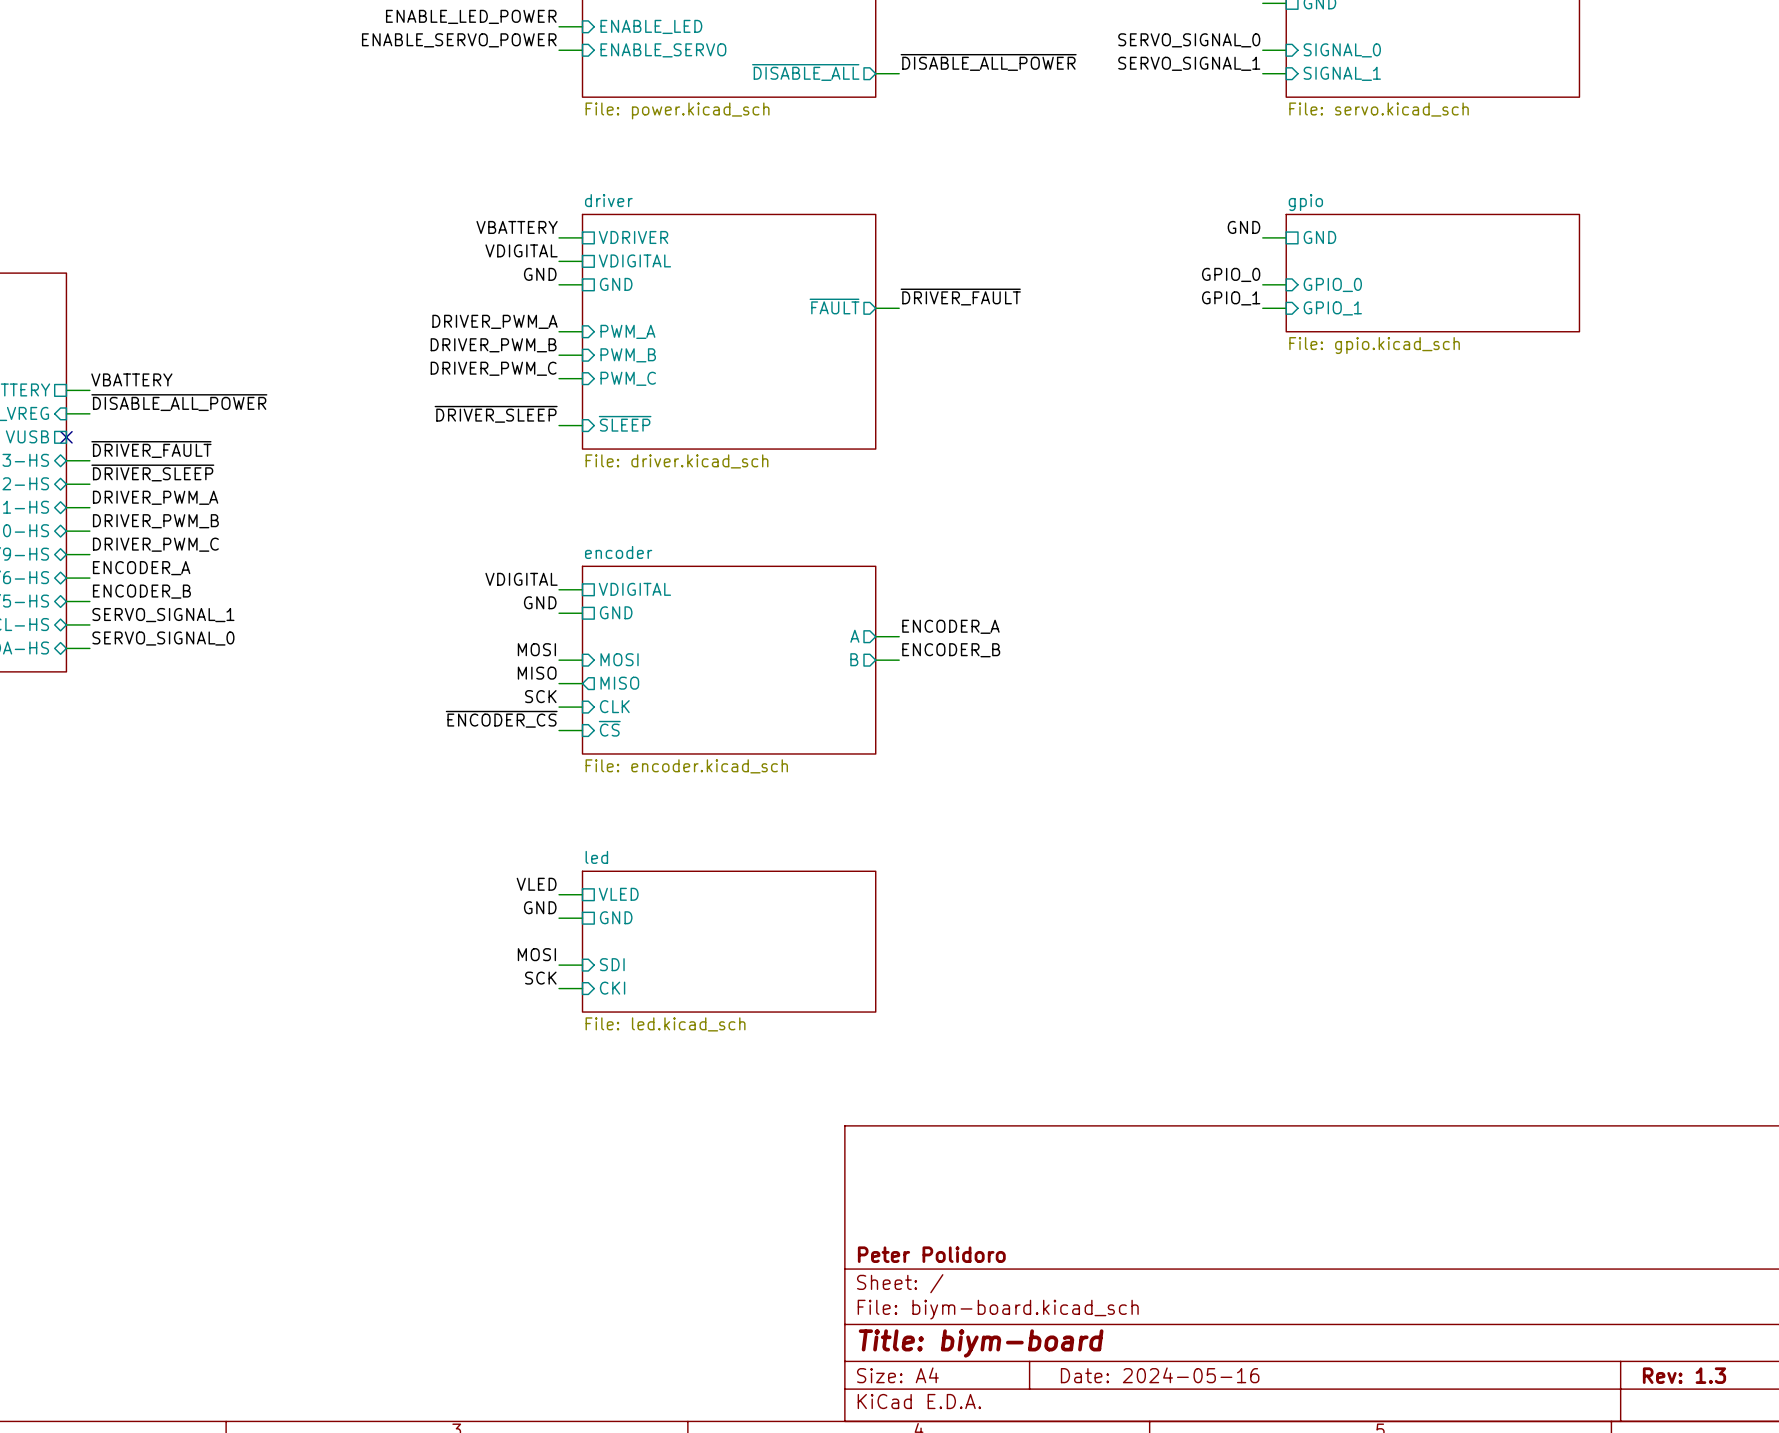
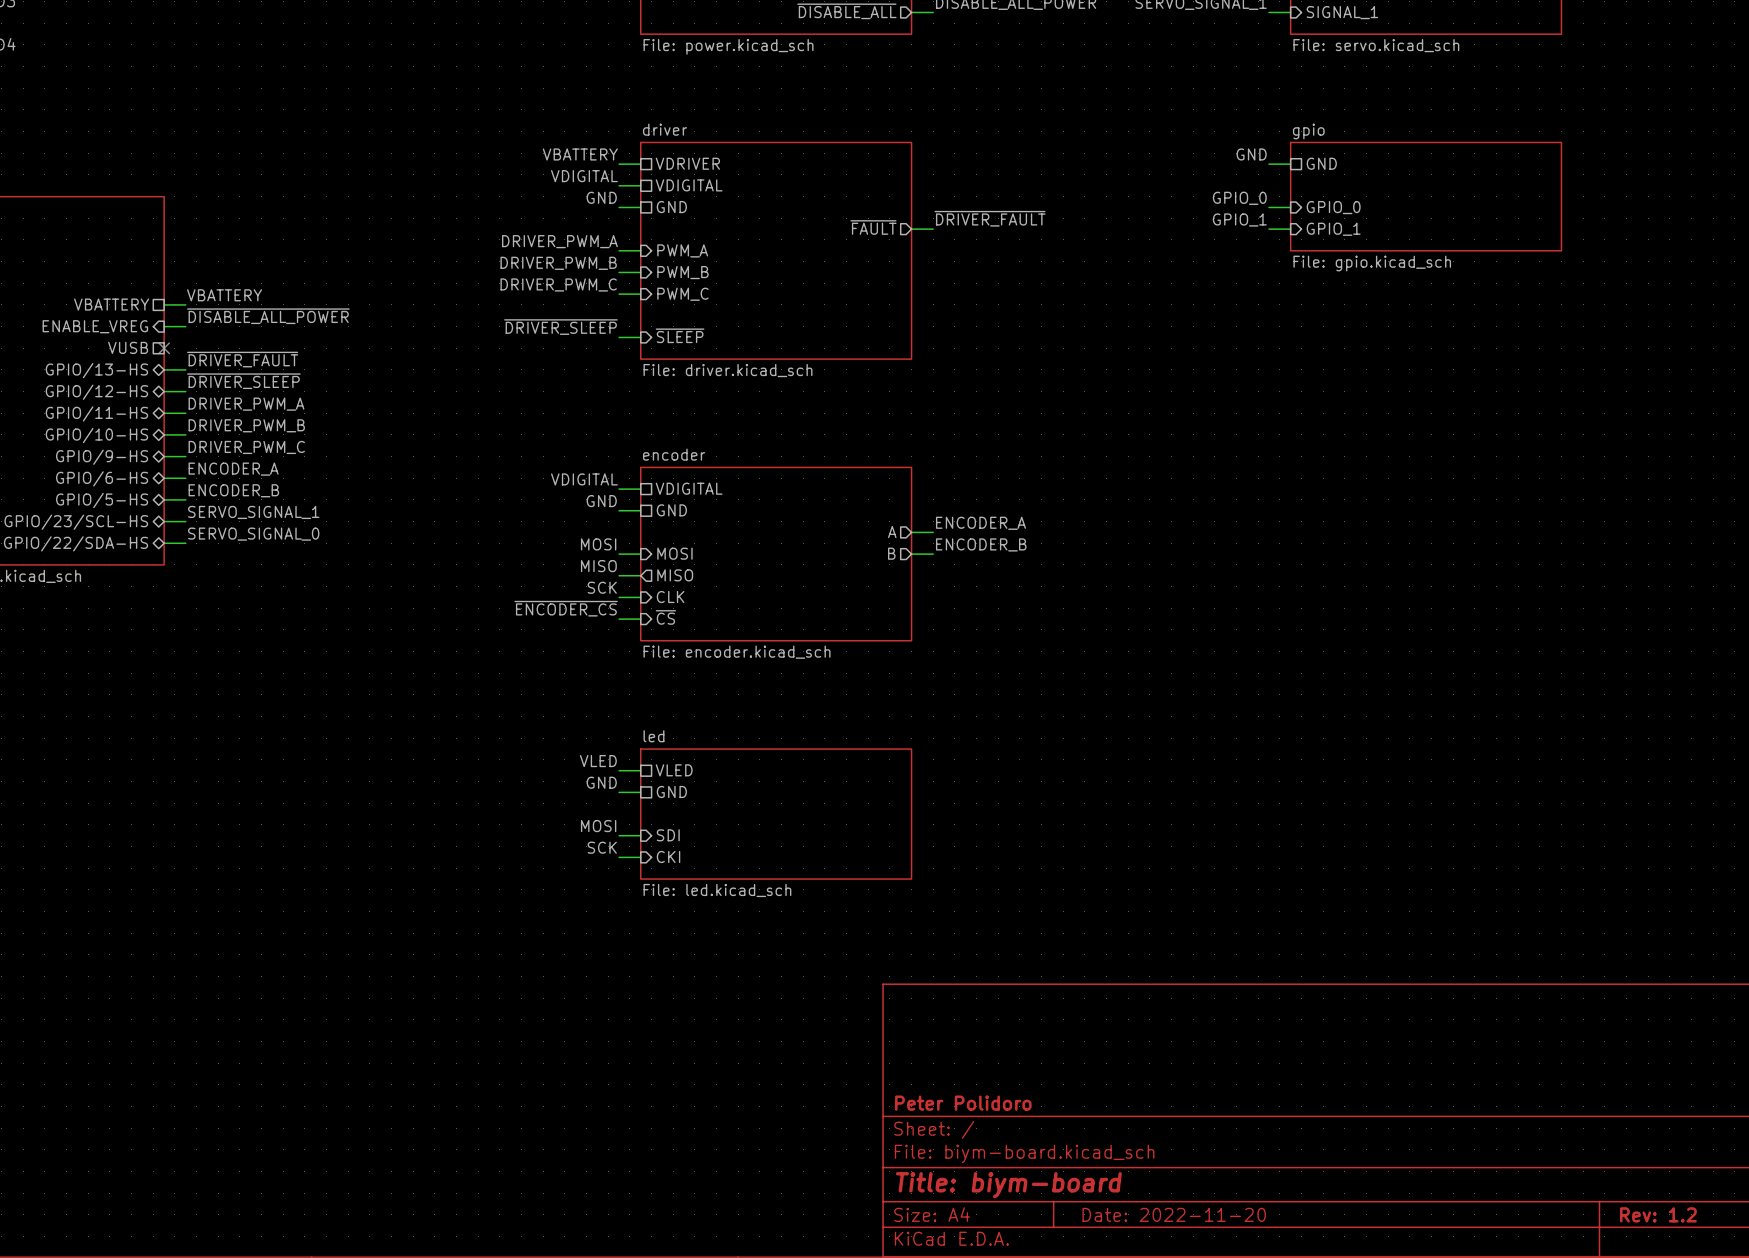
title block: Date: 2024-05-16 (1160, 1375) -> Date: 2022-11-20 (1174, 1214)
title block: Rev: 1.3 (1684, 1375) -> Rev: 1.2 (1658, 1214)

